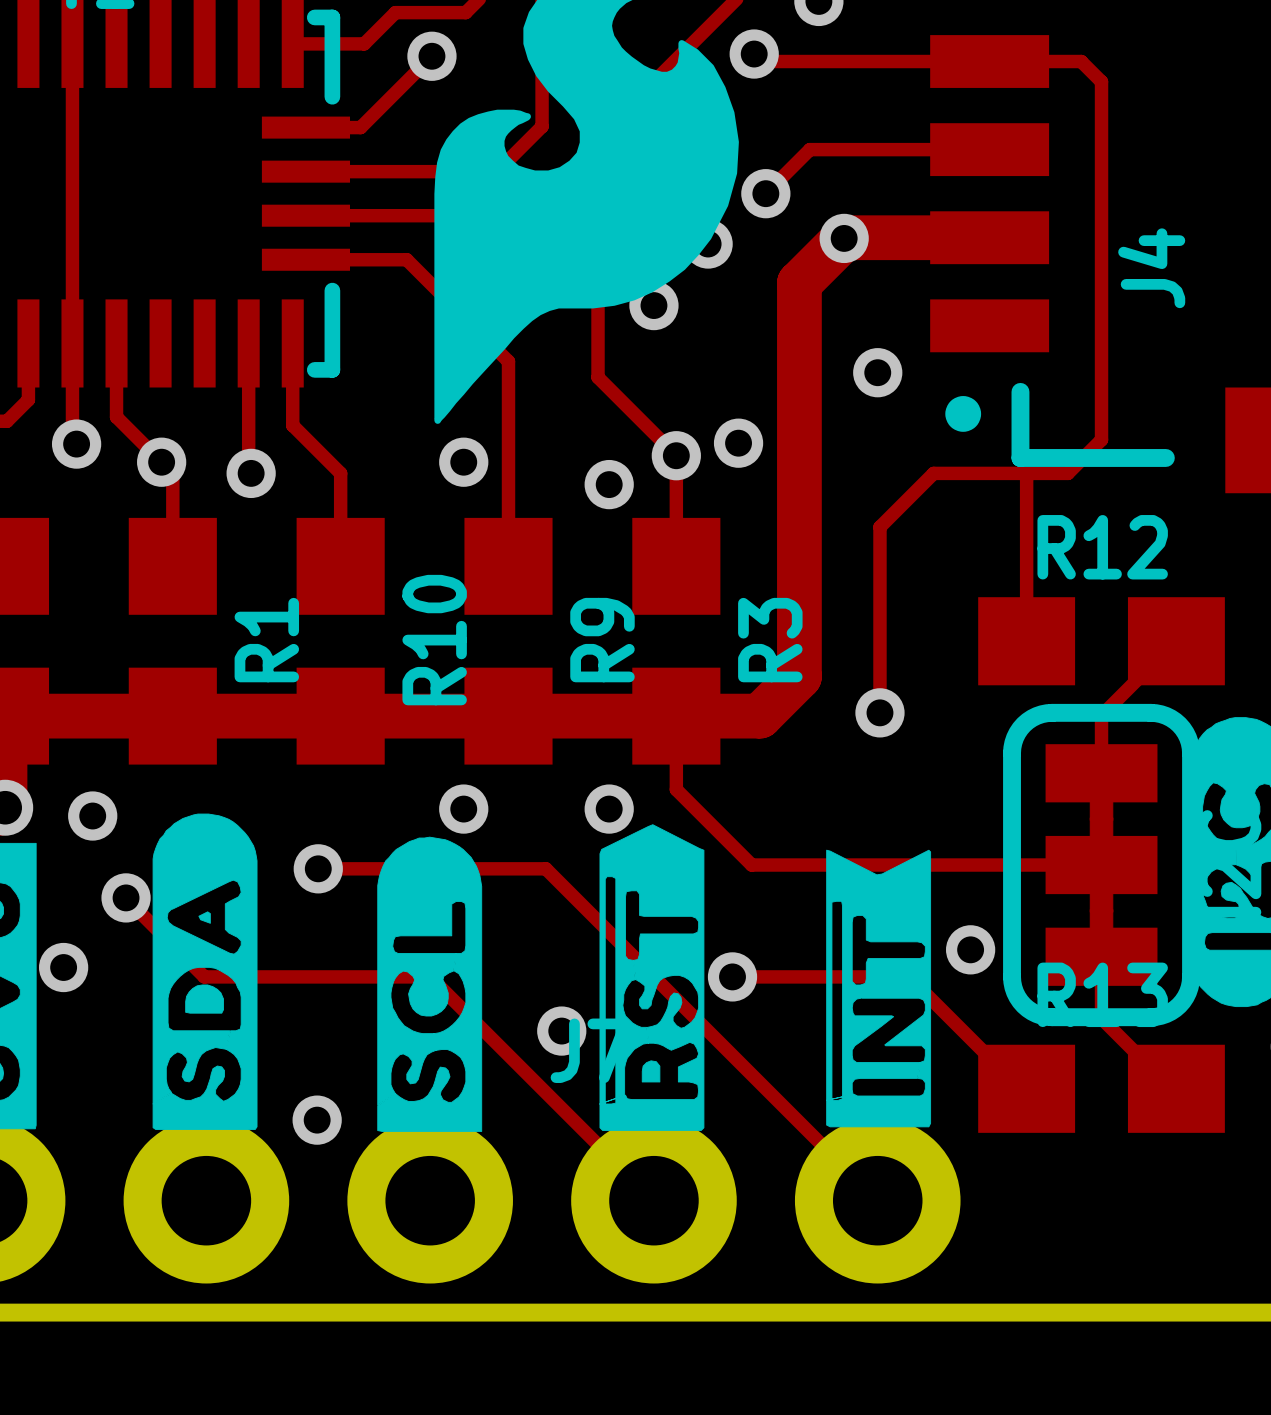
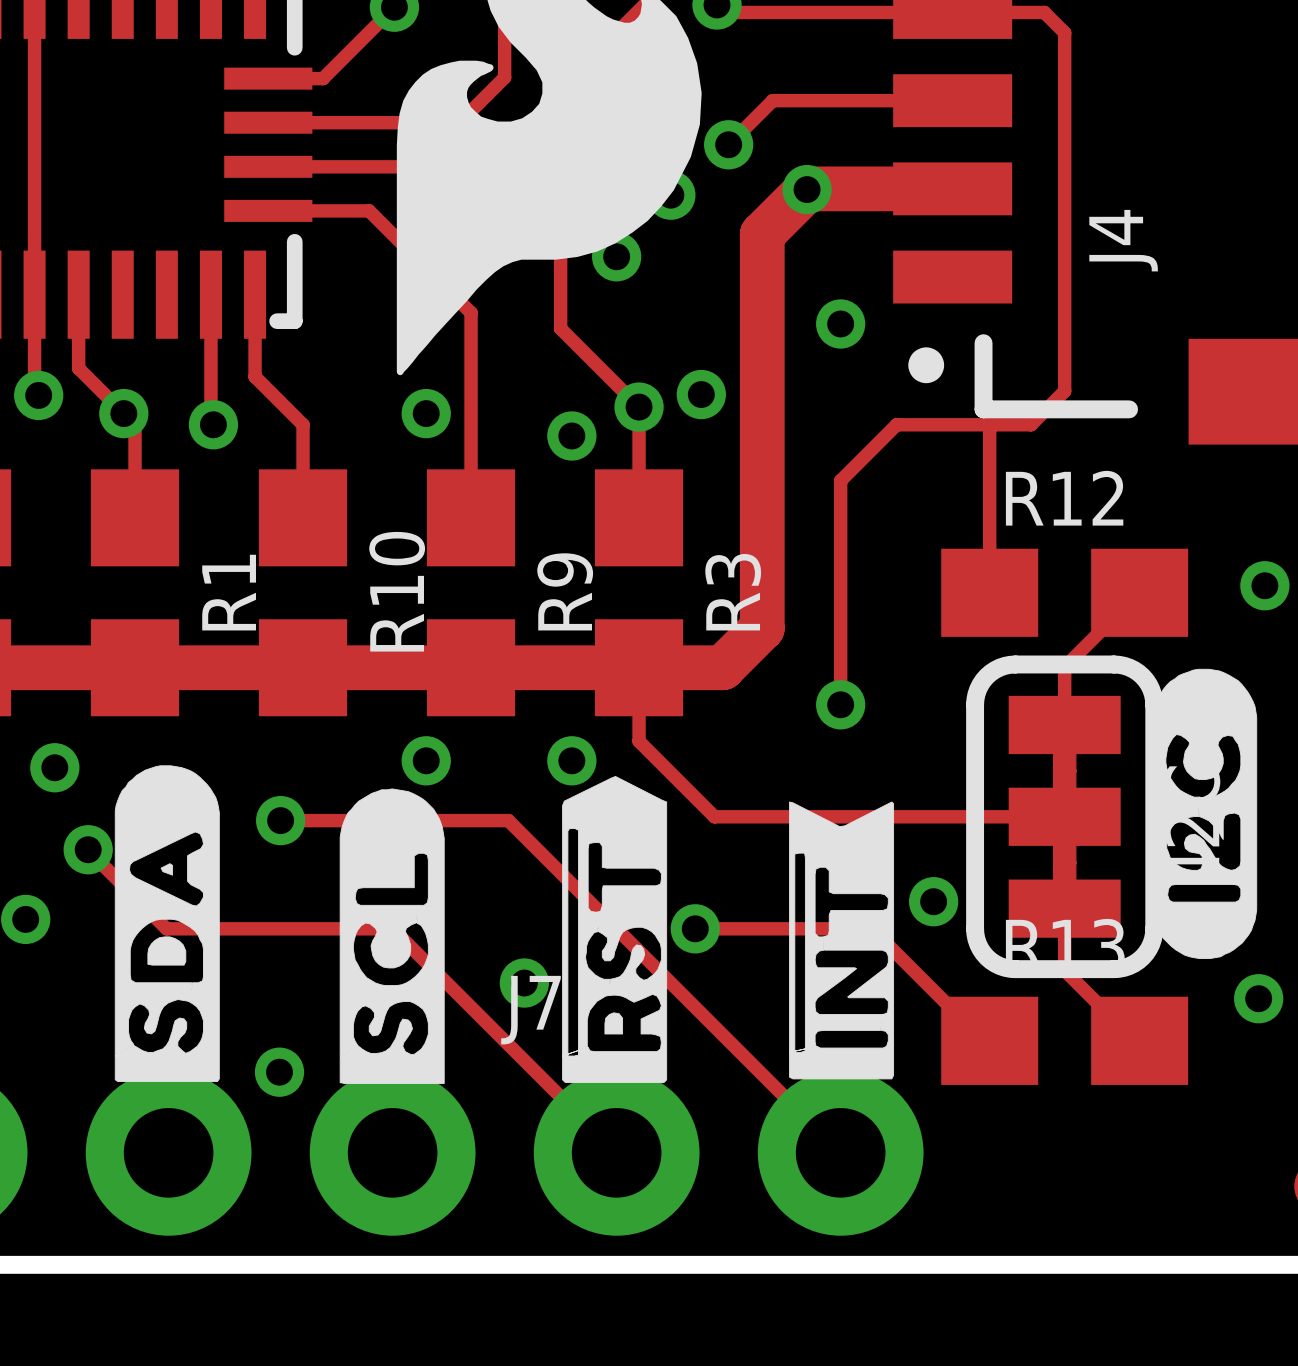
track: (879, 527) (879, 712) -> (842, 478) (840, 480) (840, 704)
via position: (879, 712) -> (840, 704)

